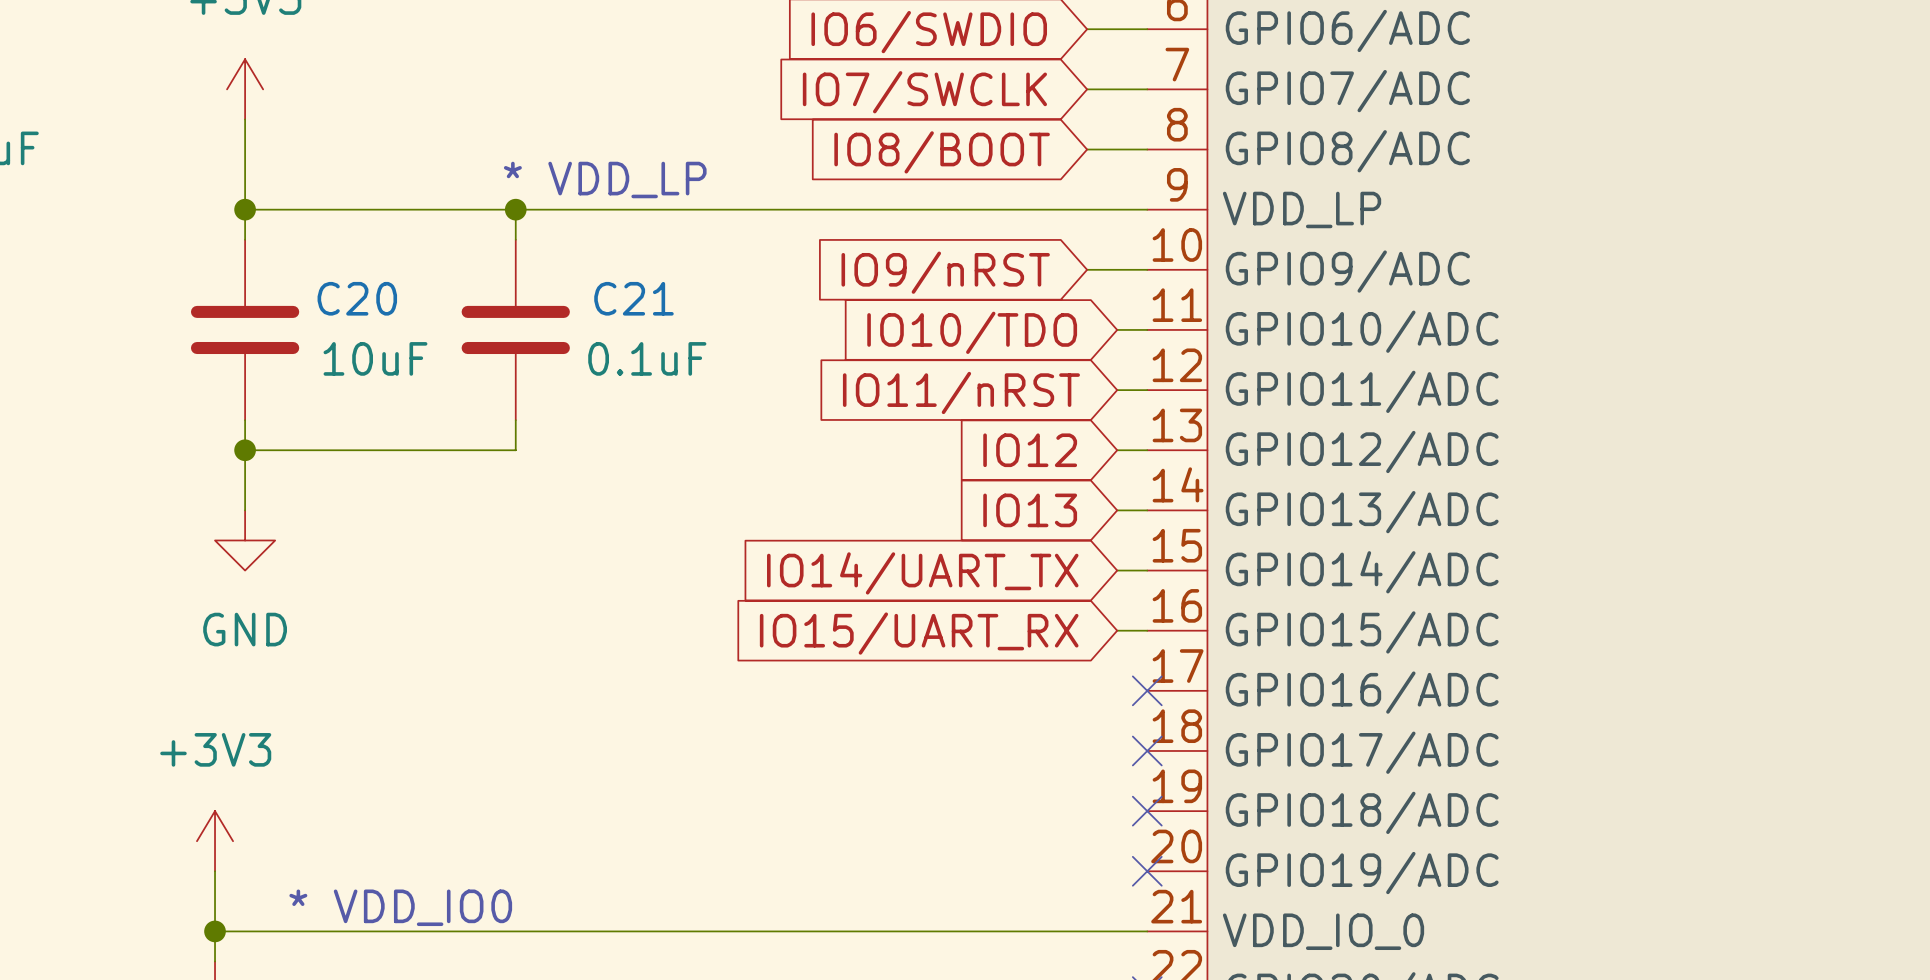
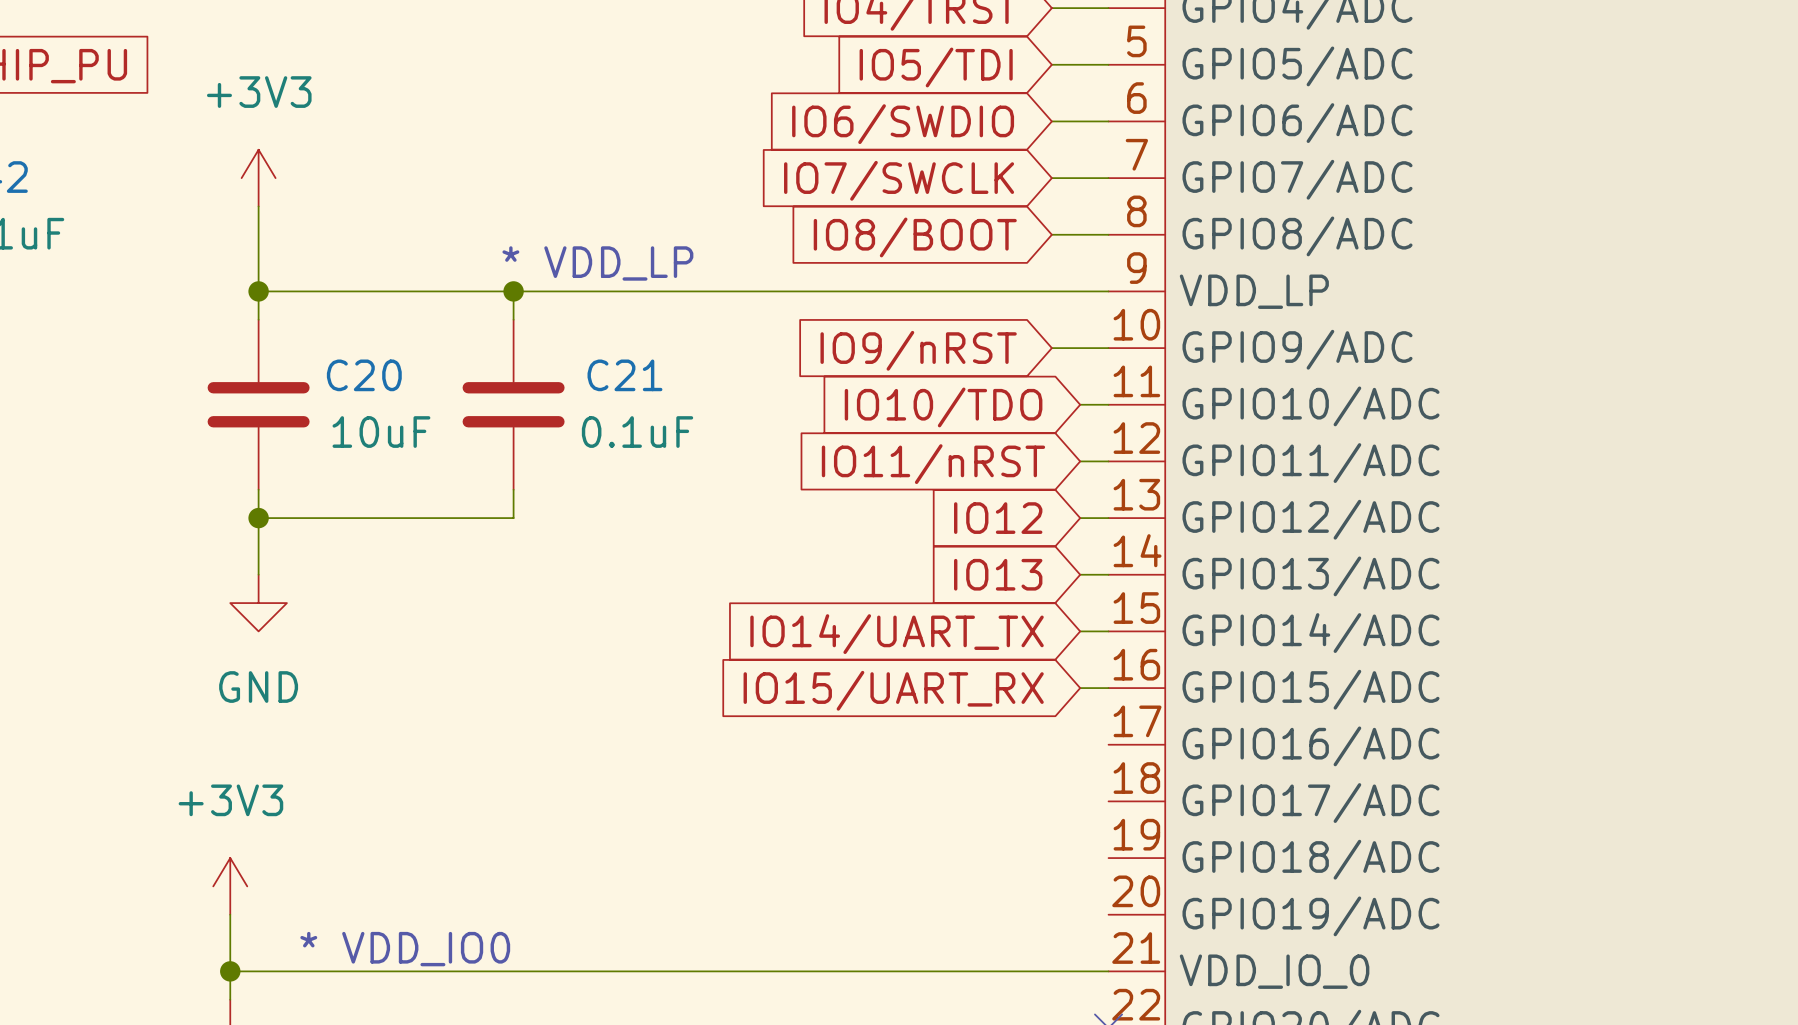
no-connect mark: (1147, 690) -> none
no-connect mark: (1147, 750) -> none
no-connect mark: (1147, 811) -> none
no-connect mark: (1147, 871) -> none

